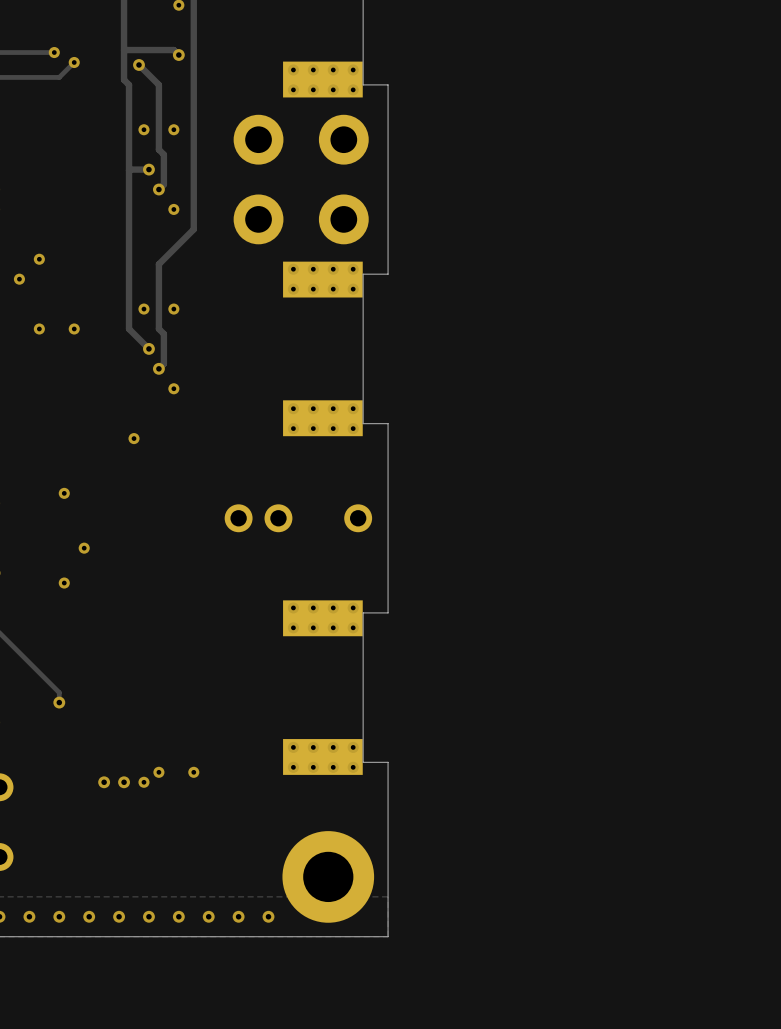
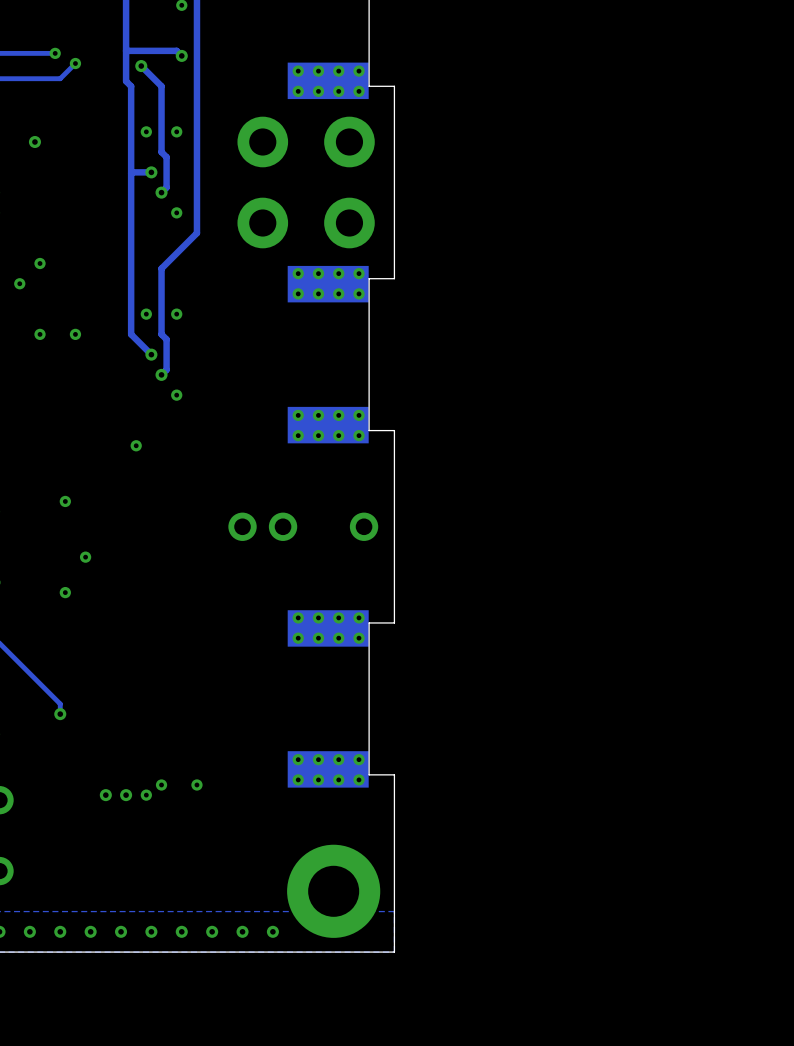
via: none -> (34, 141)

